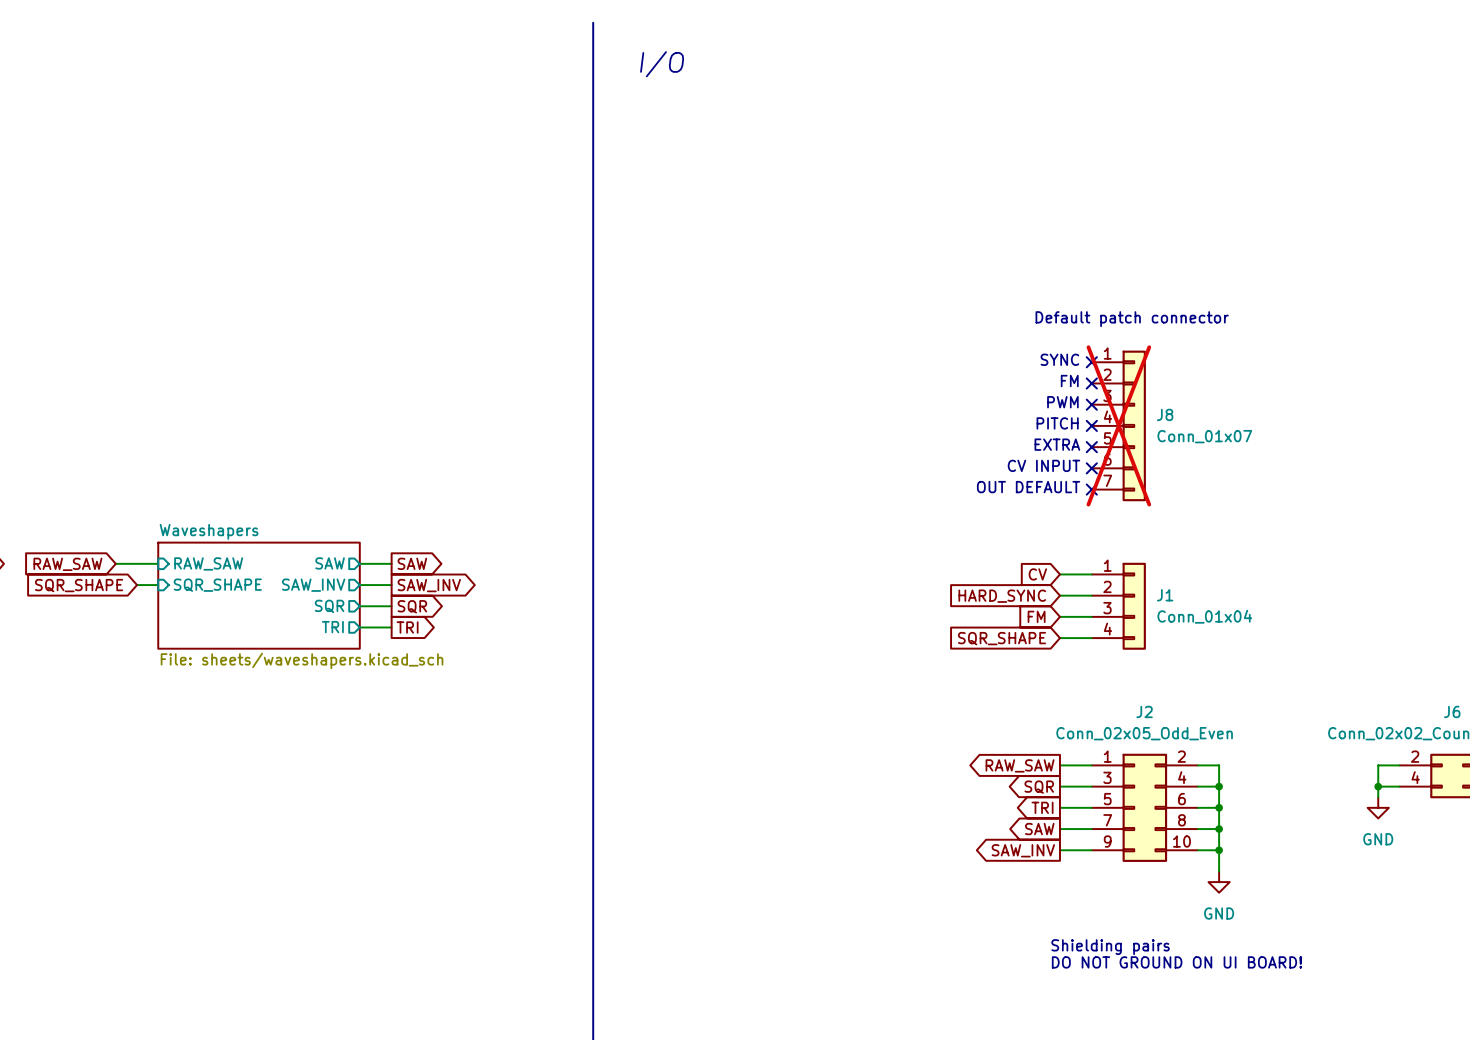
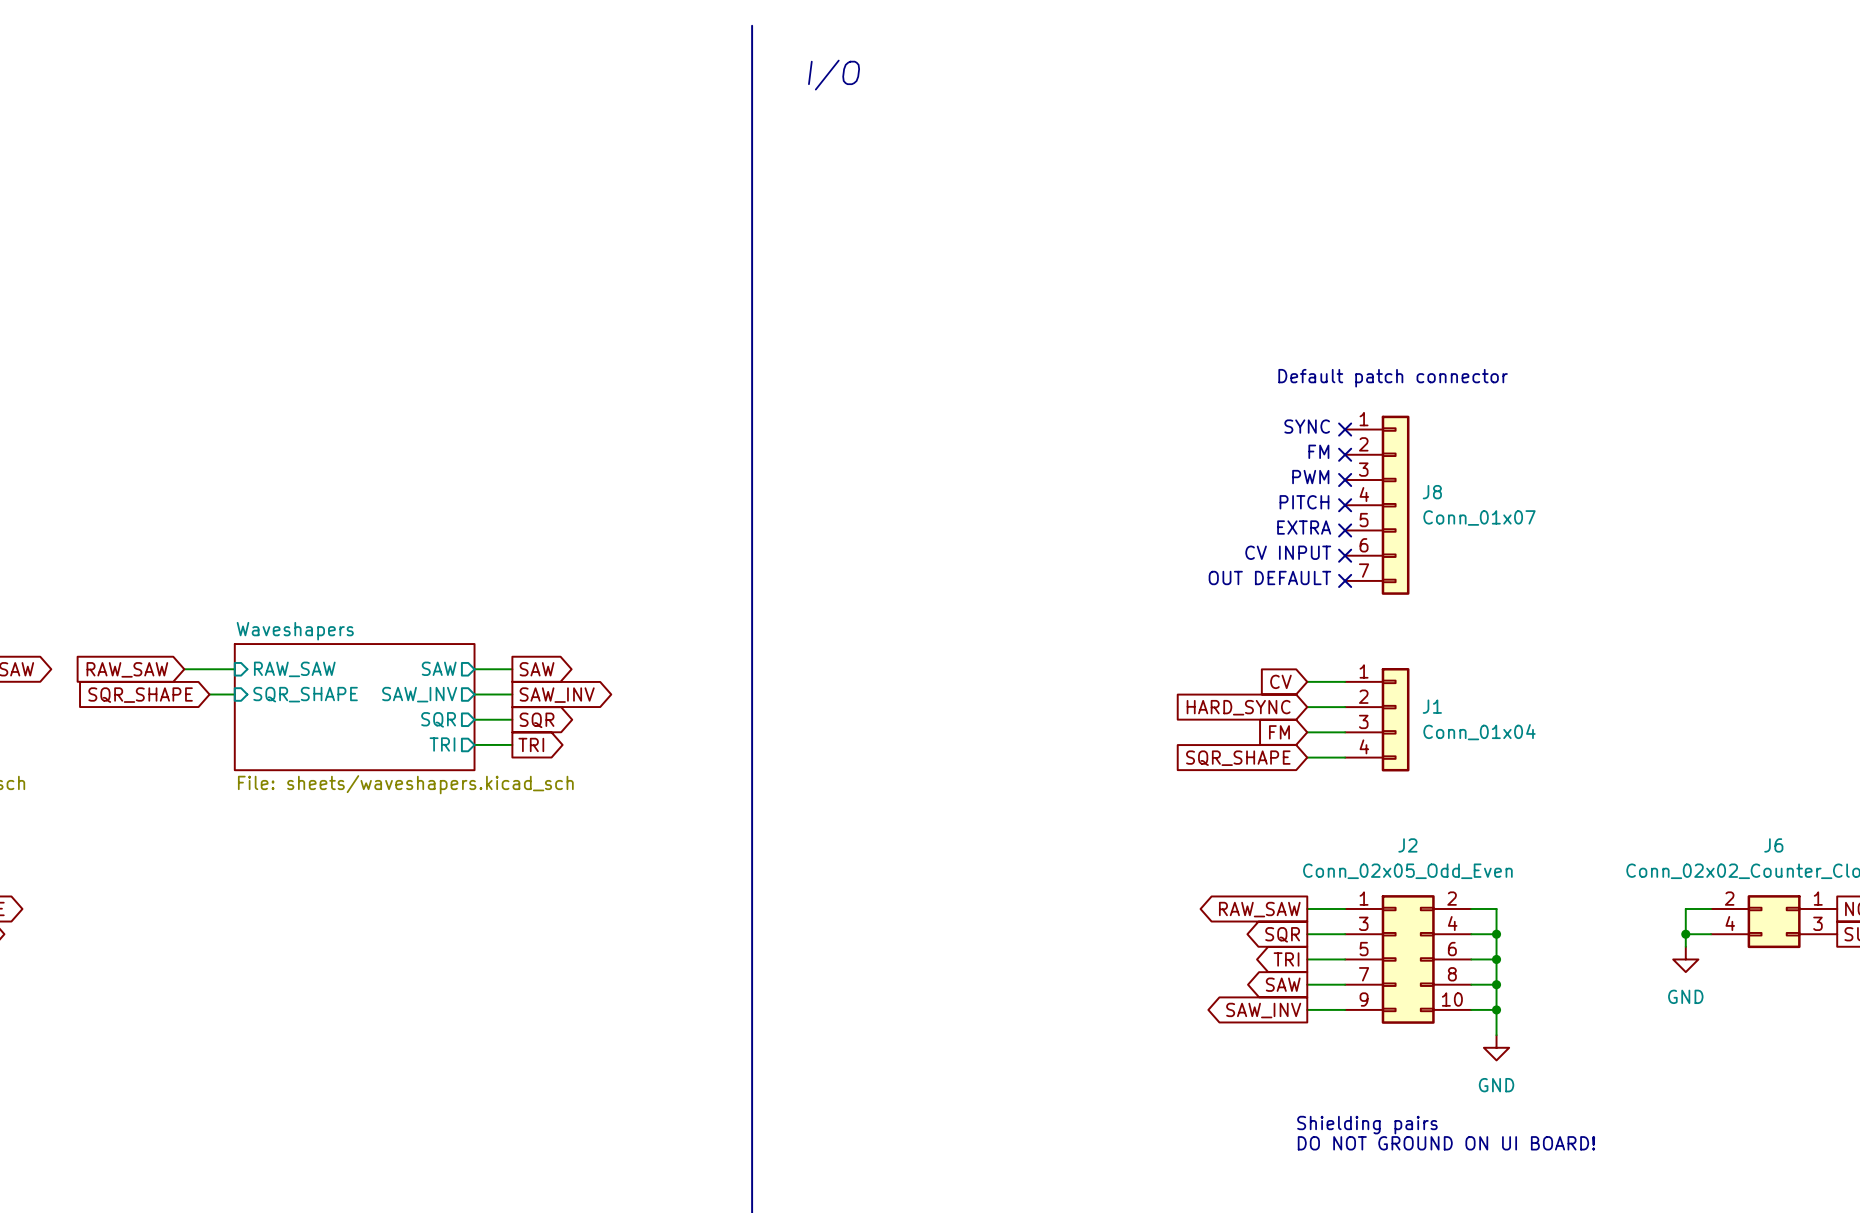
J8 do-not-place cross: (1118, 425) -> none

